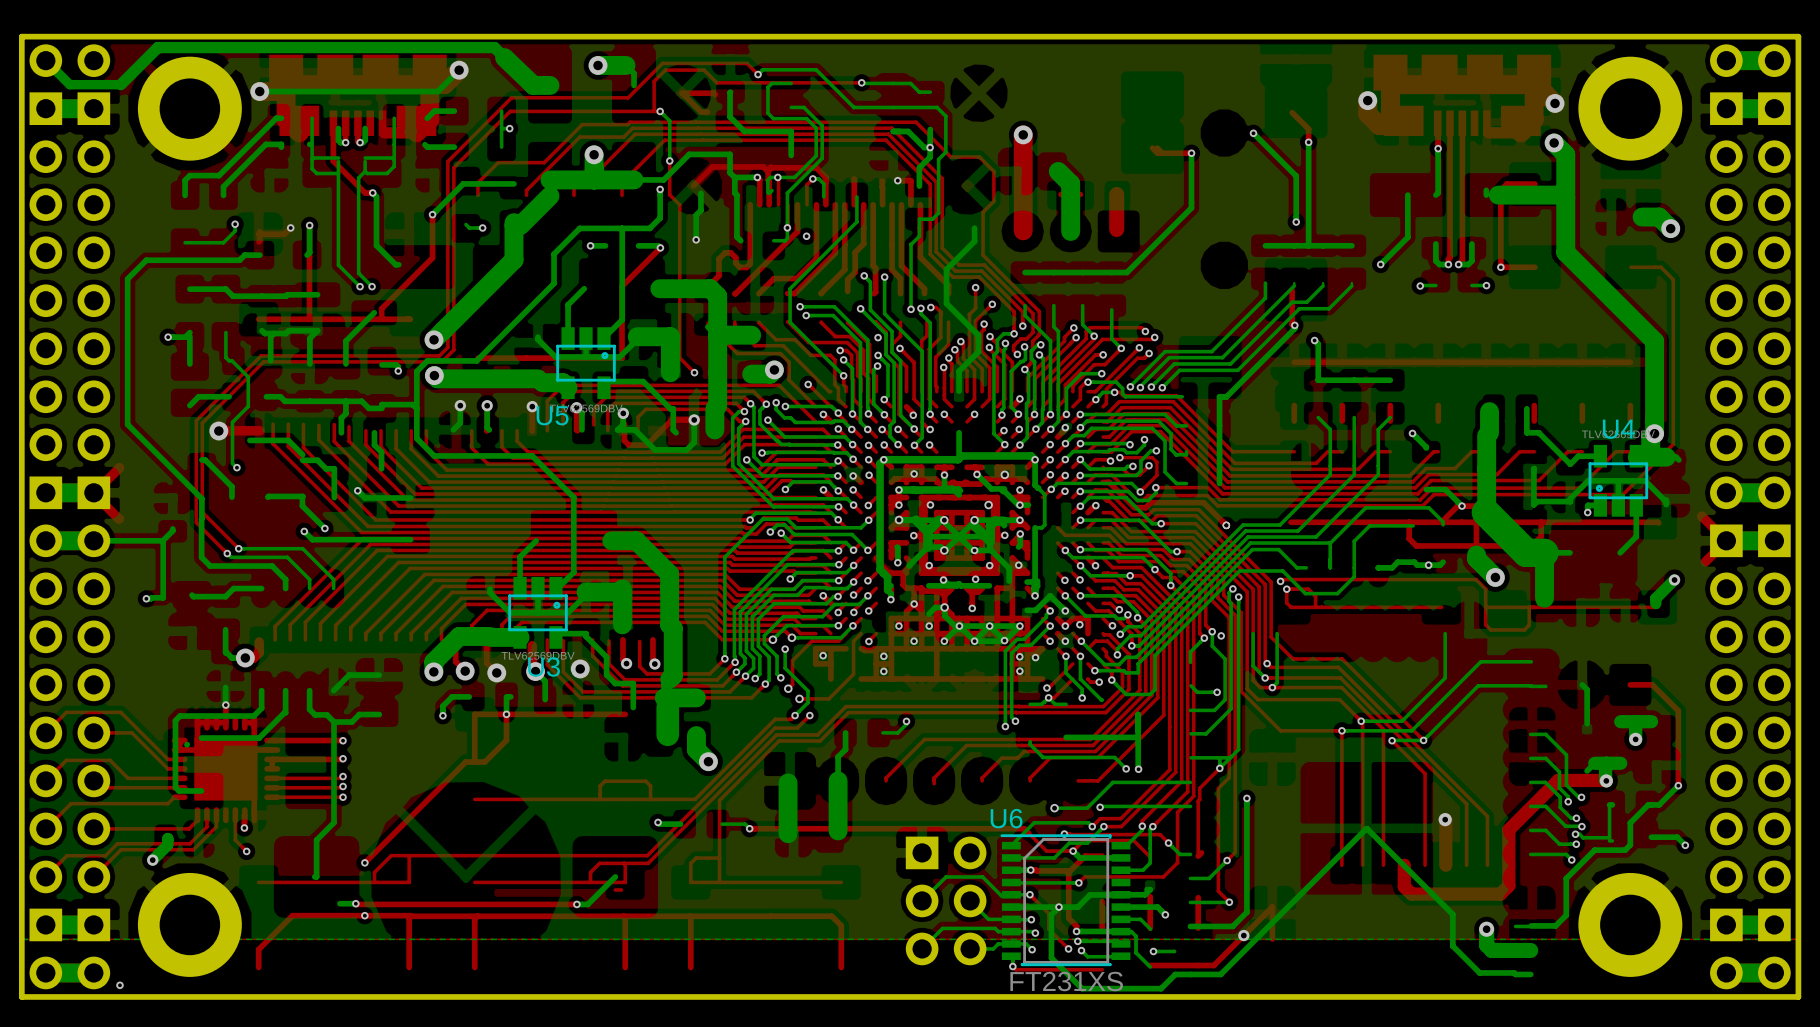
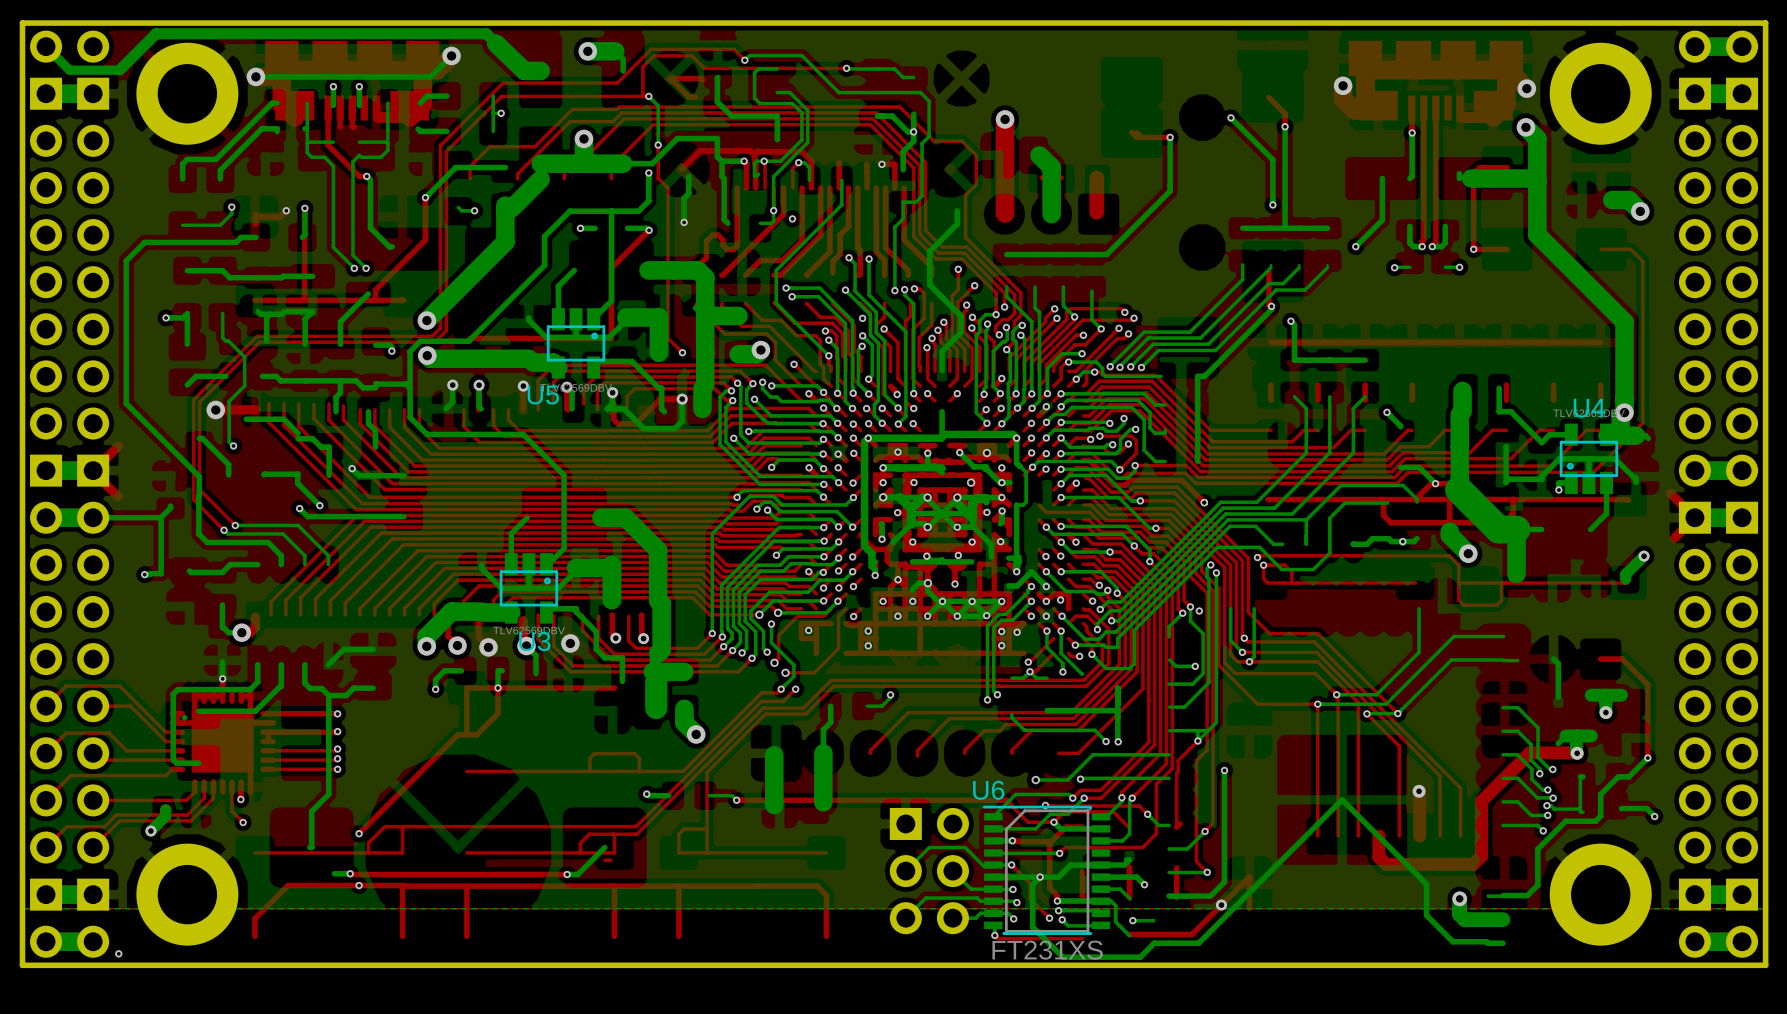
bottom track: none -> (333, 86) (333, 105)
via: none -> (333, 86)
bottom track: none -> (359, 86) (359, 105)
via: none -> (359, 86)
bottom track: (338, 128) (338, 140) (345, 142) -> none
bottom track: (365, 128) (365, 140) (360, 142) -> none
via: (345, 142) -> none
via: (360, 142) -> none
bottom track: (338, 161) (338, 265) -> (324, 157) (333, 166) (333, 247)
bottom track: (365, 161) (365, 171) -> none
bottom track: (329, 173) (338, 173) -> none

